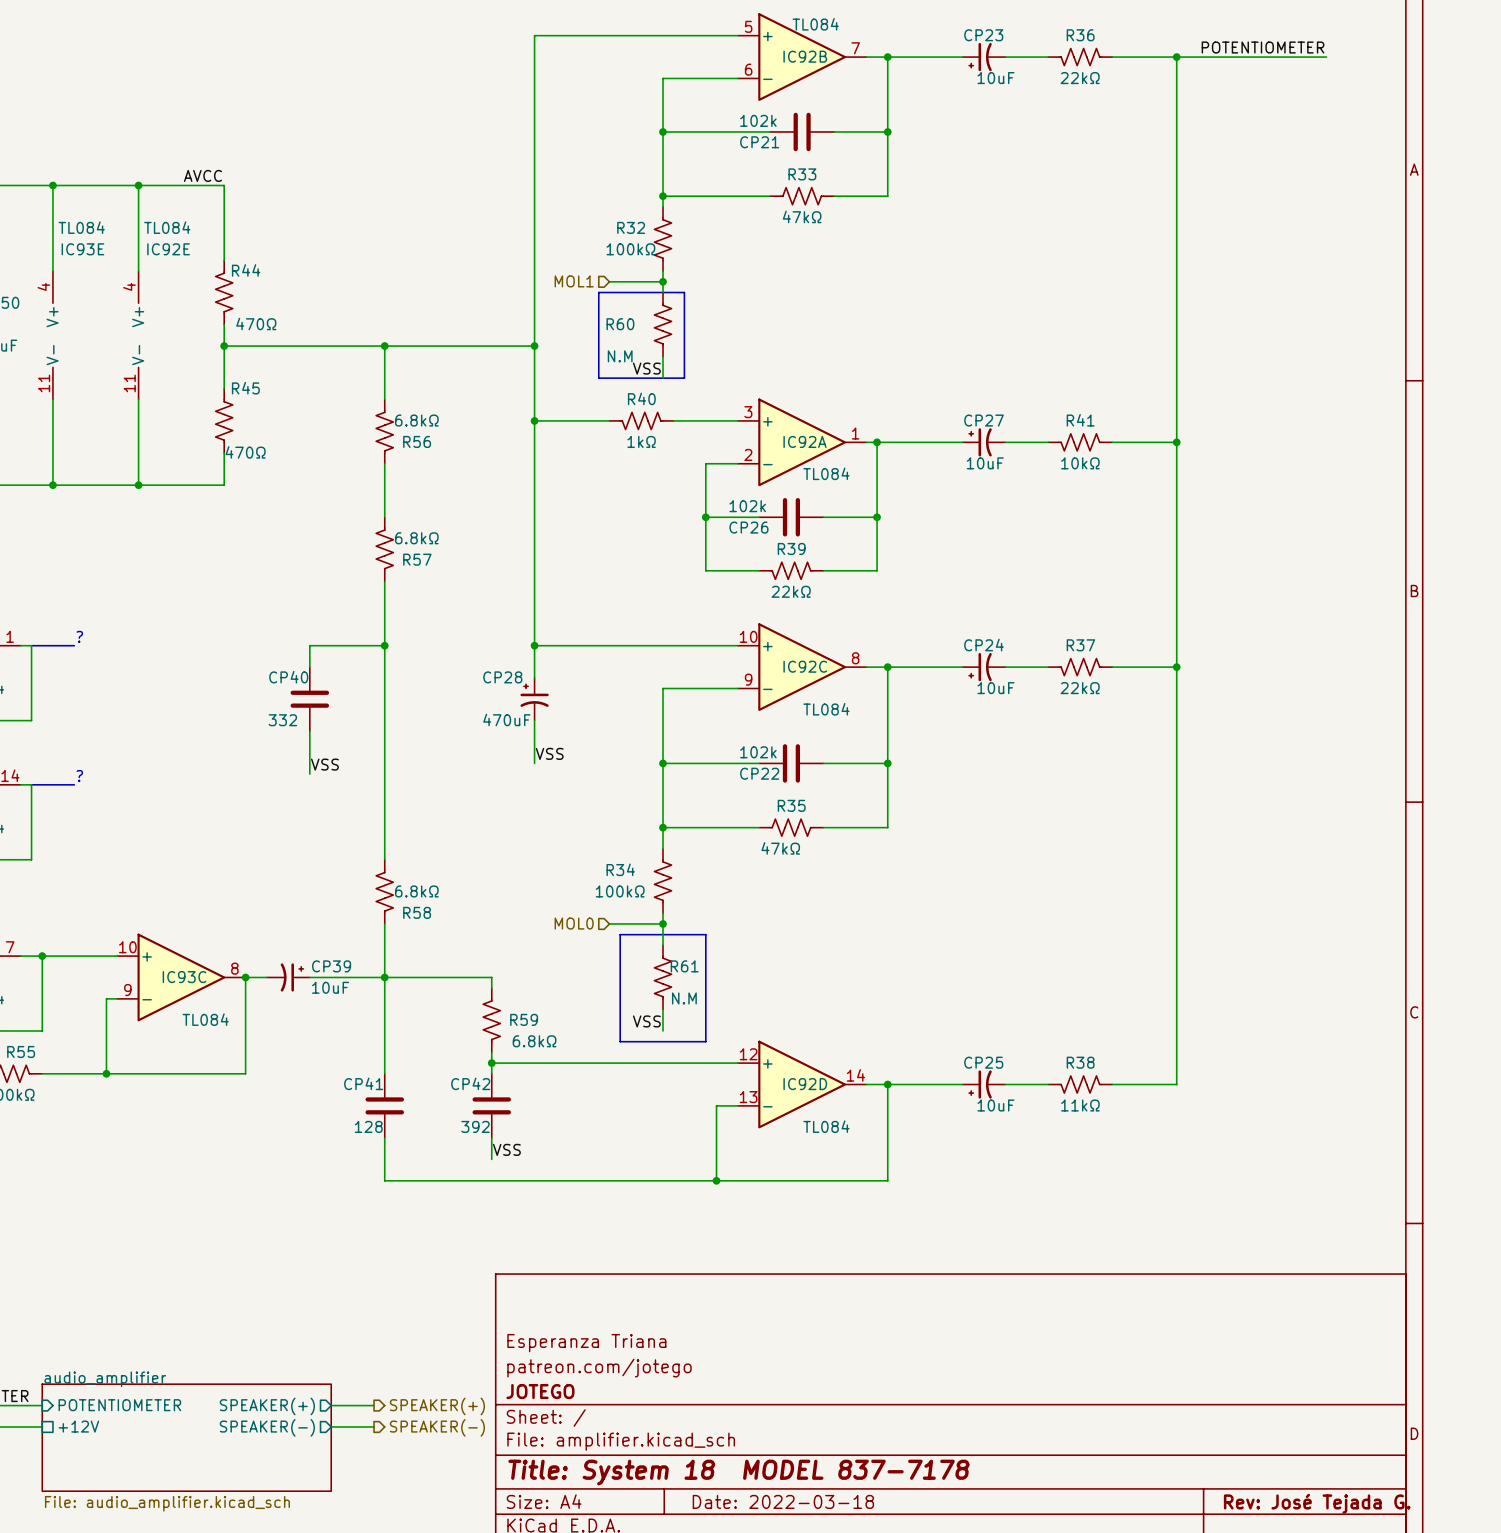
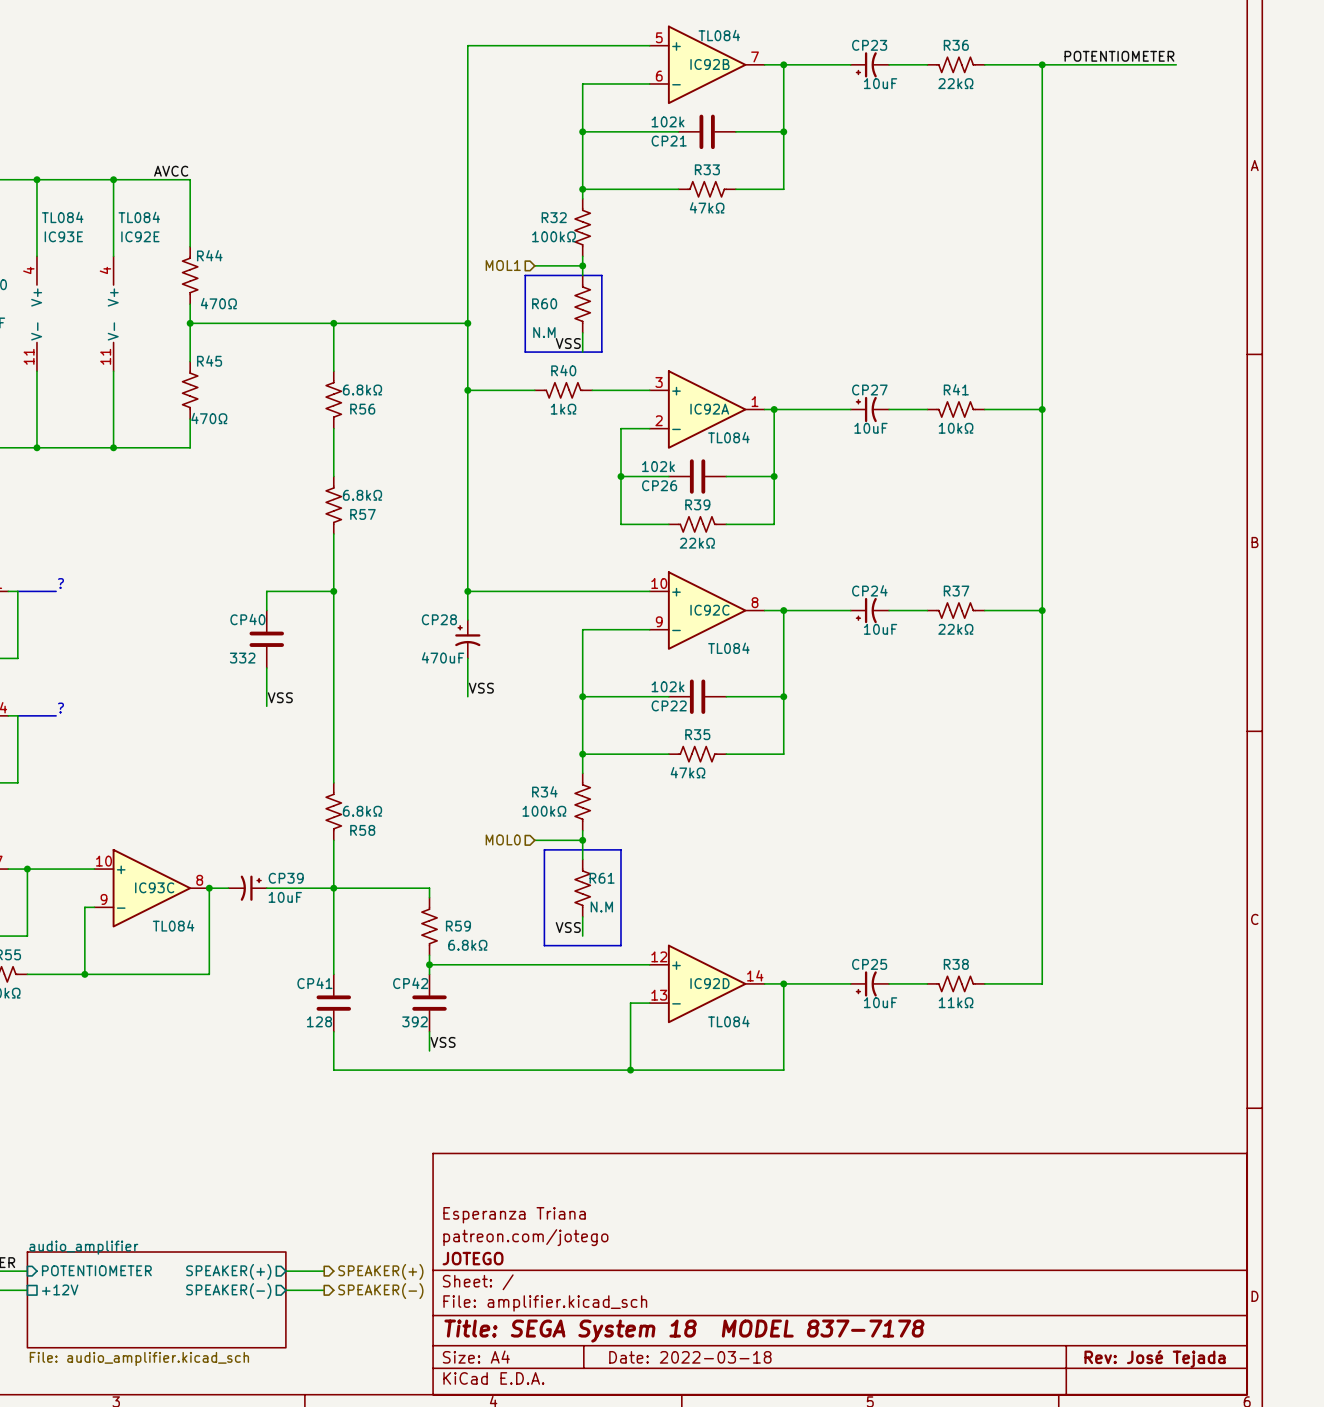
title block: Title: System 18 MODEL 837-7178 (739, 1472) -> Title: SEGA System 18 MODEL 837-7178 (684, 1331)
title block: Rev: José Tejada G. (1317, 1503) -> Rev: José Tejada (1155, 1358)

